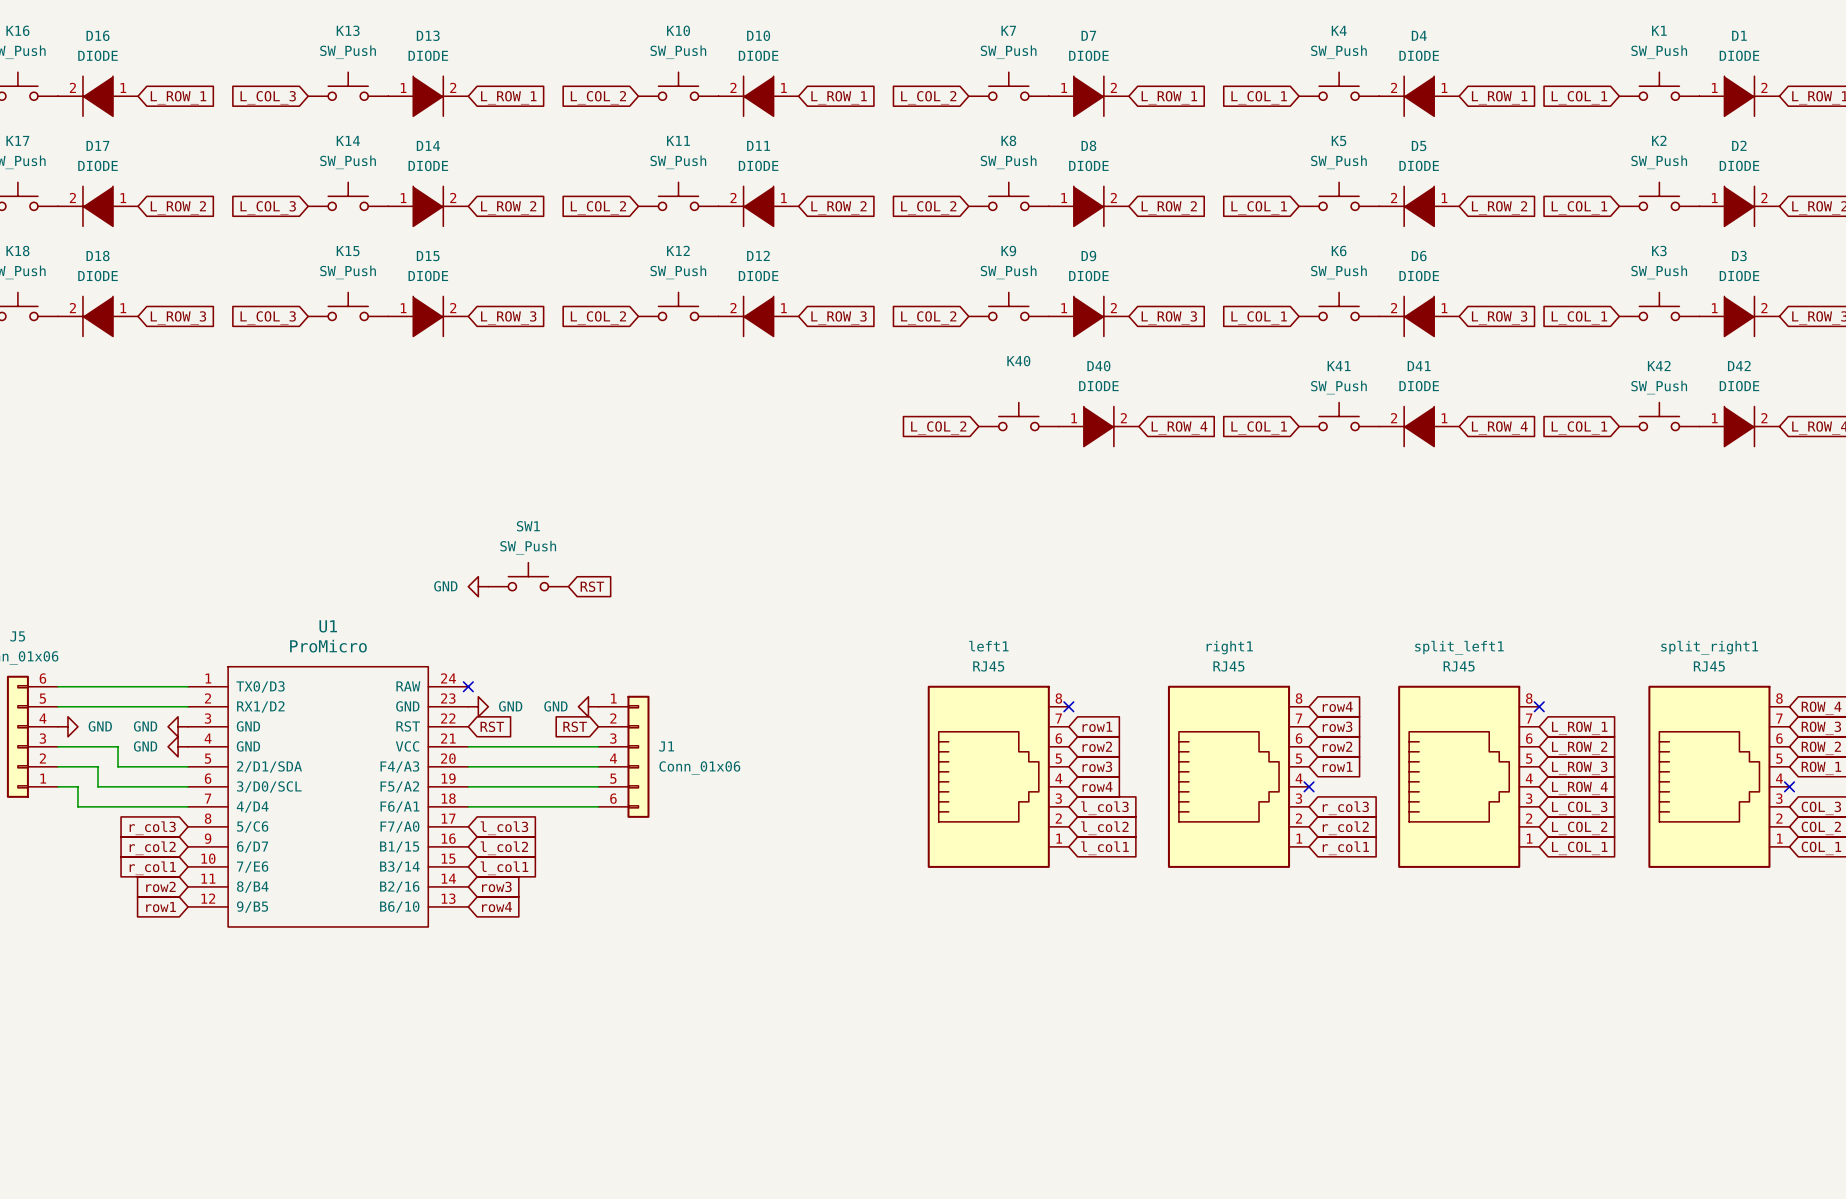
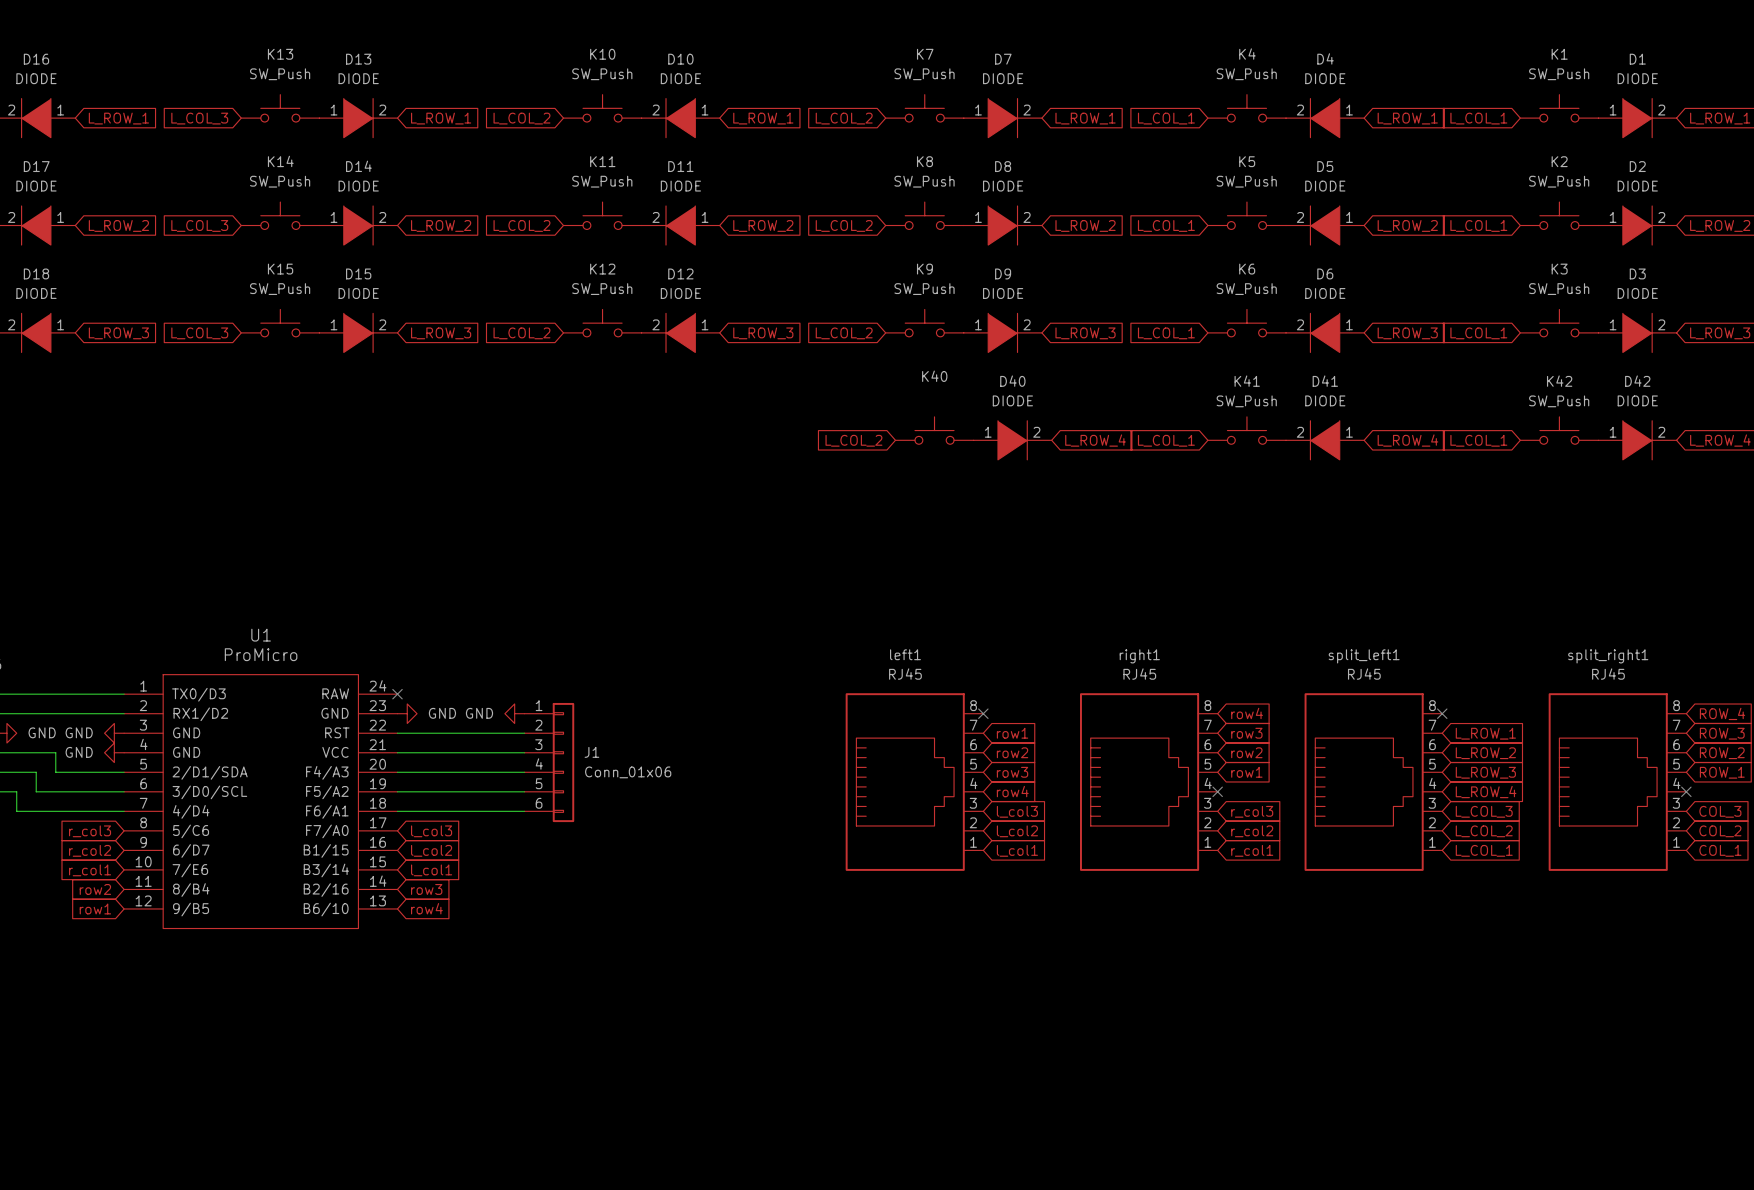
SW1: SW_Push (528, 576) -> none
power symbol: GND (478, 586) -> none
global label: RST (592, 586) -> none
wire: none -> (397, 733) (524, 733)
global label: RST (492, 726) -> none
global label: RST (575, 726) -> none

